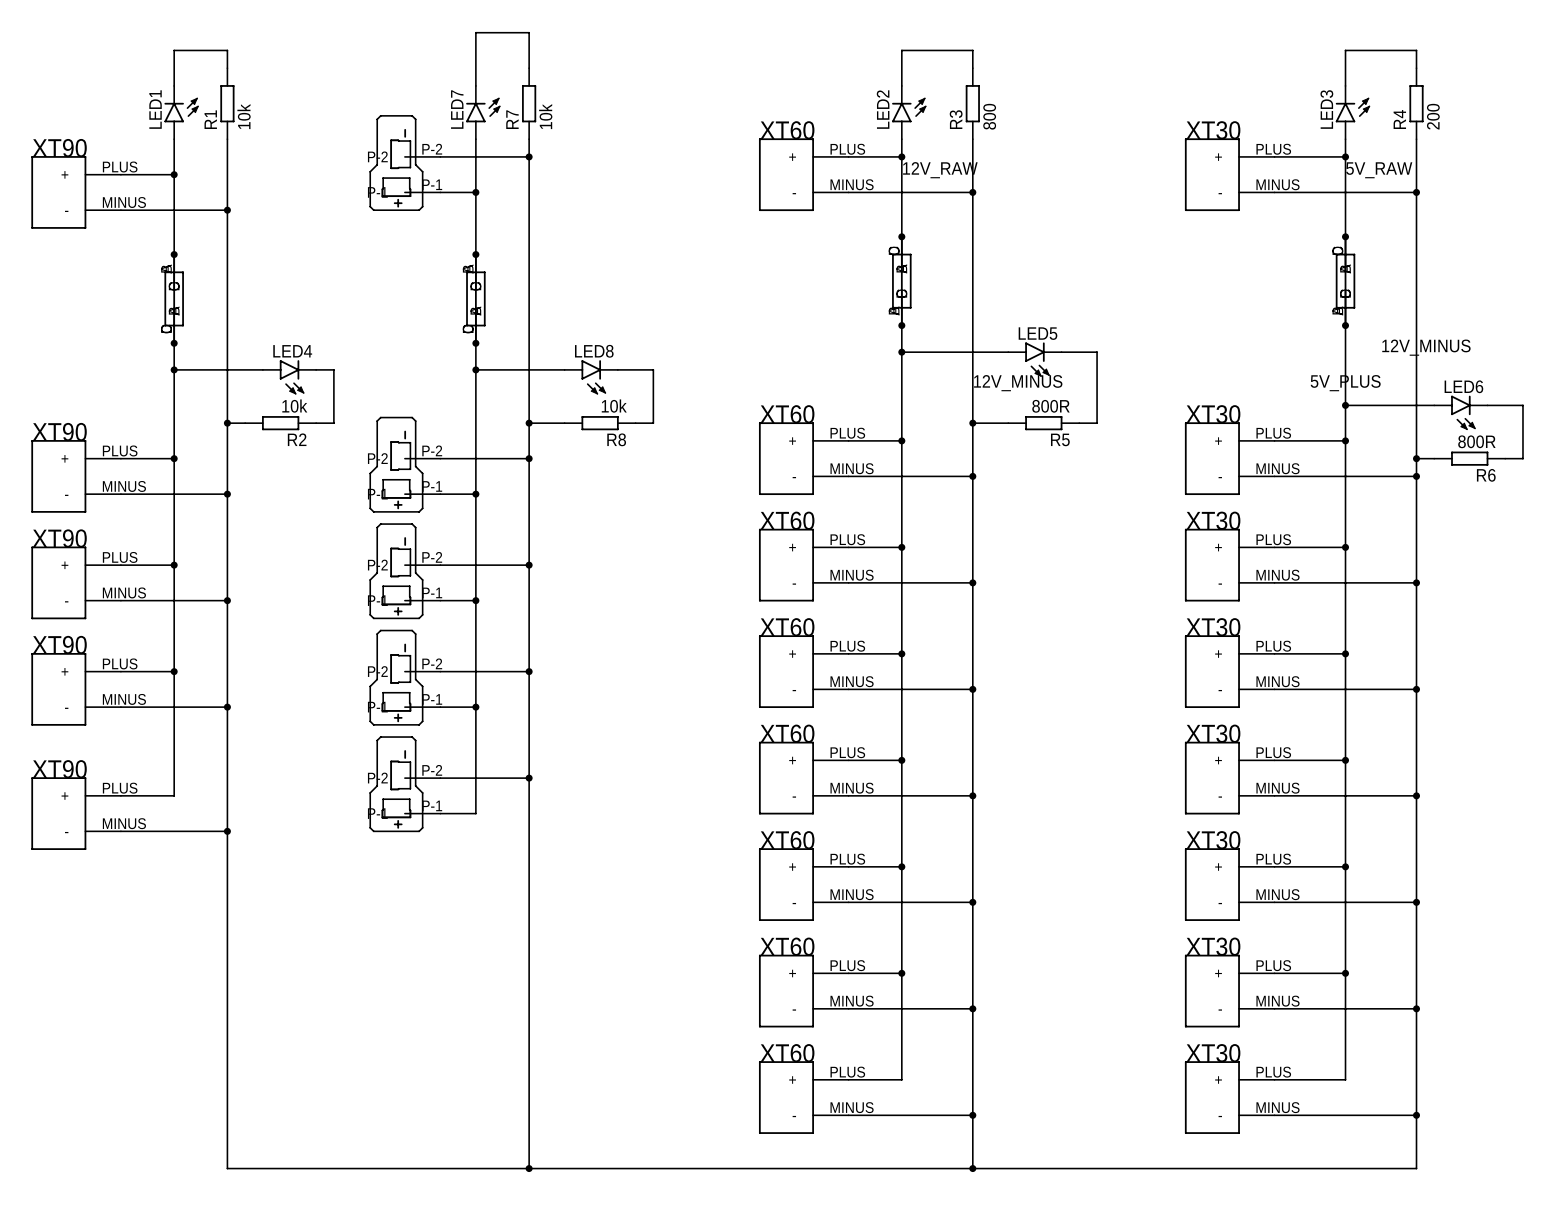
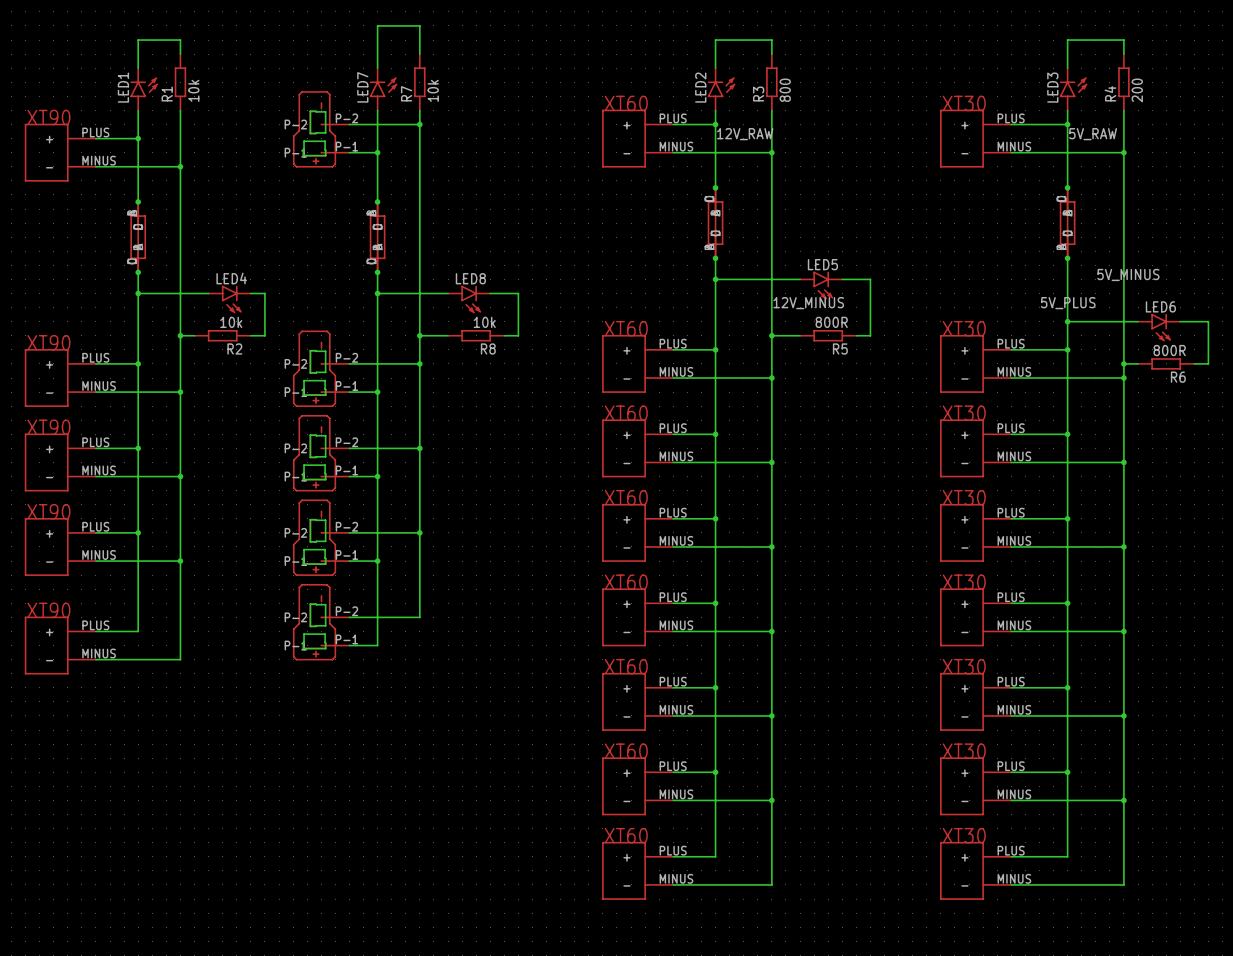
label: 12V_MINUS (1426, 347) -> 5V_MINUS (1128, 274)
wire: (529, 778) (529, 1168) -> none
junction: (529, 778) -> none
wire: (227, 831) (227, 1168) (1416, 1168) (1416, 1115) -> none
junction: (227, 831) -> none
wire: (972, 1115) (972, 1168) -> none
junction: (972, 1115) -> none
junction: (1416, 1115) -> none
junction: (529, 1168) -> none
junction: (972, 1168) -> none

